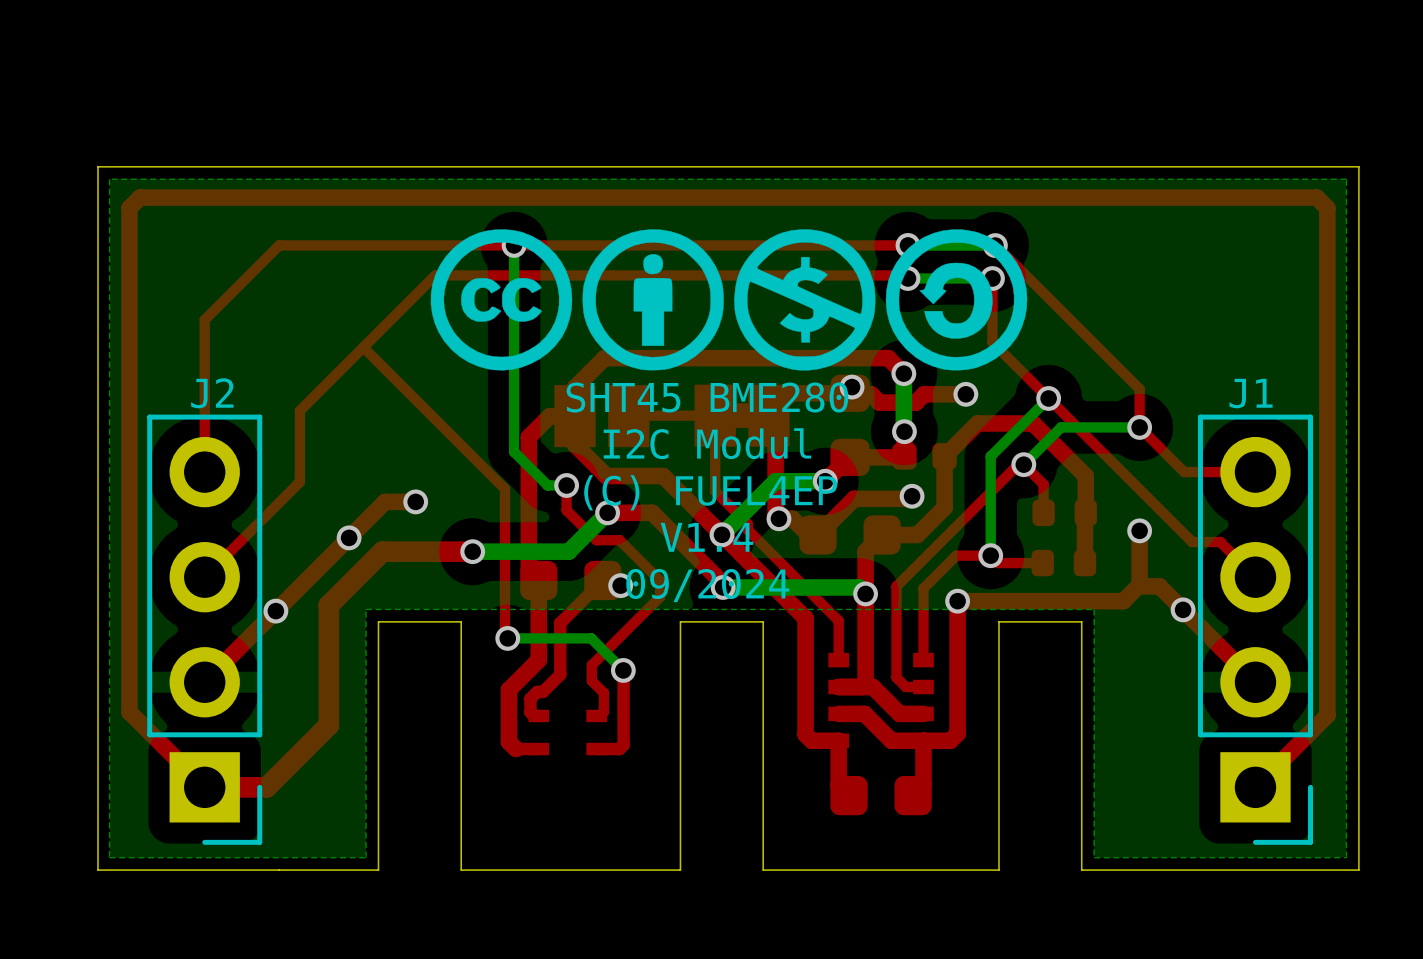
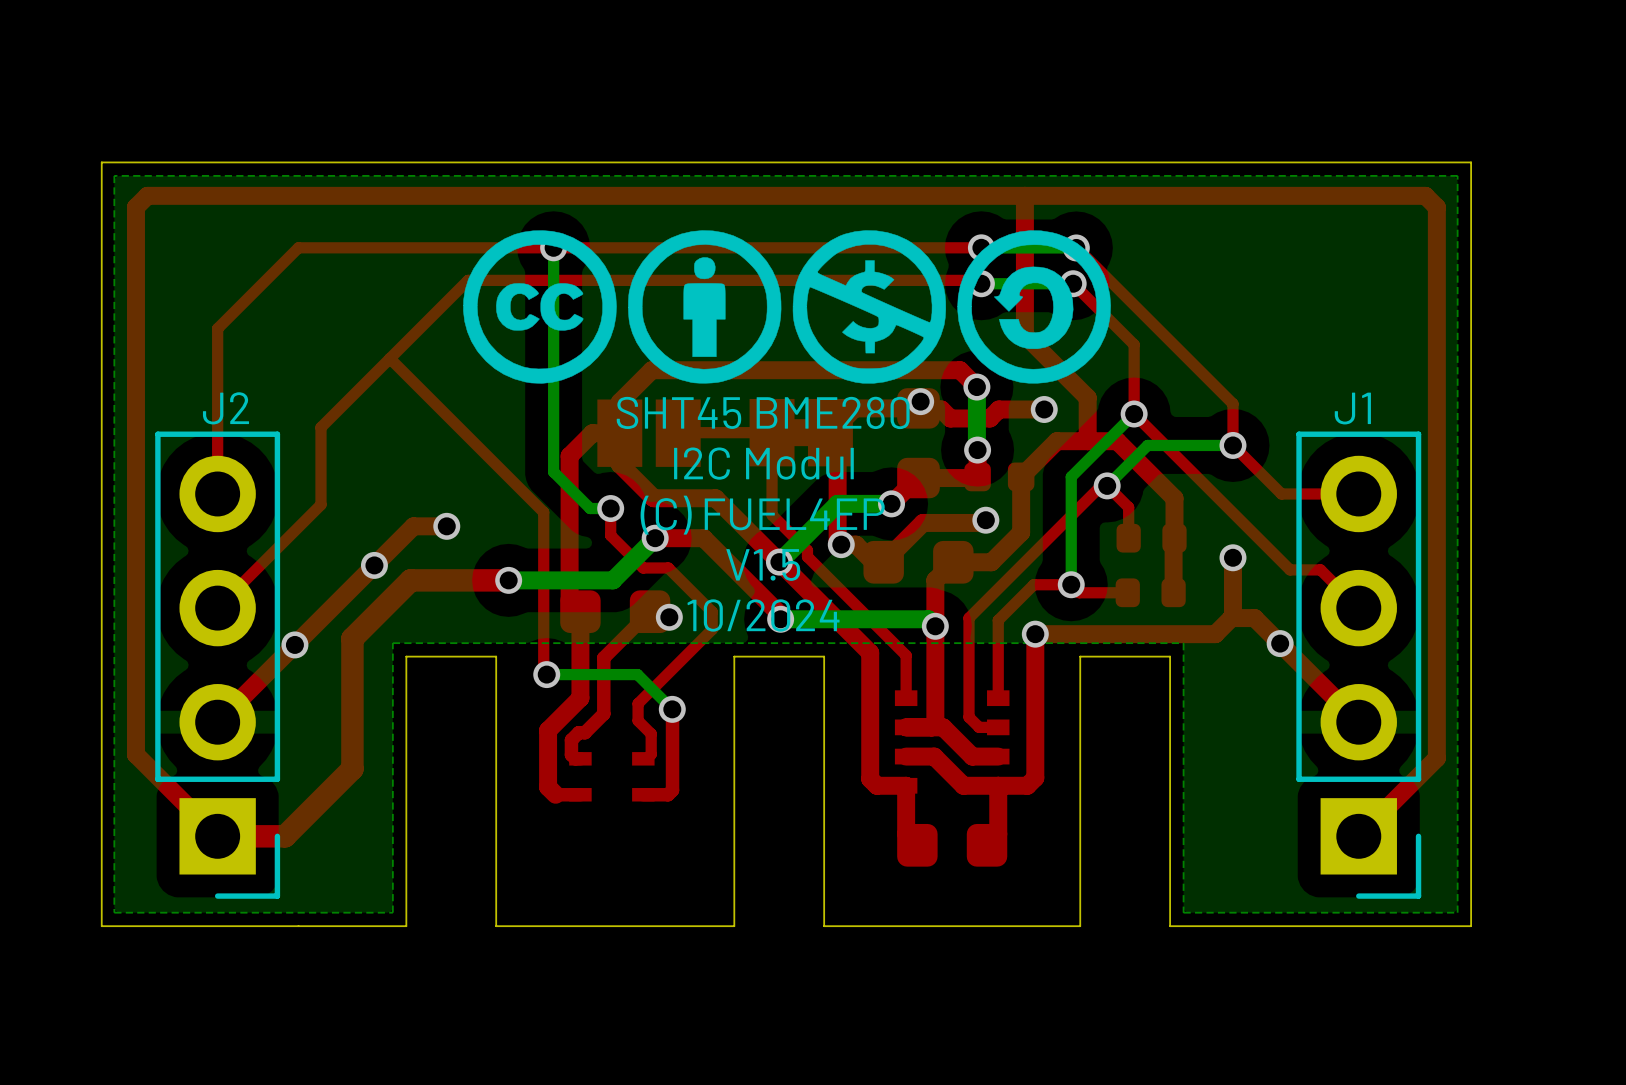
top track: none -> (1024, 195) (1024, 335) (1087, 397) (1087, 441)
top track: (992, 278) (992, 342) (1048, 398) -> (1073, 283) (1134, 344) (1134, 414)
text: V1.4 (707, 537) -> V1.5 (763, 564)
text: 09/2024 (707, 585) -> 10/2024 (763, 615)

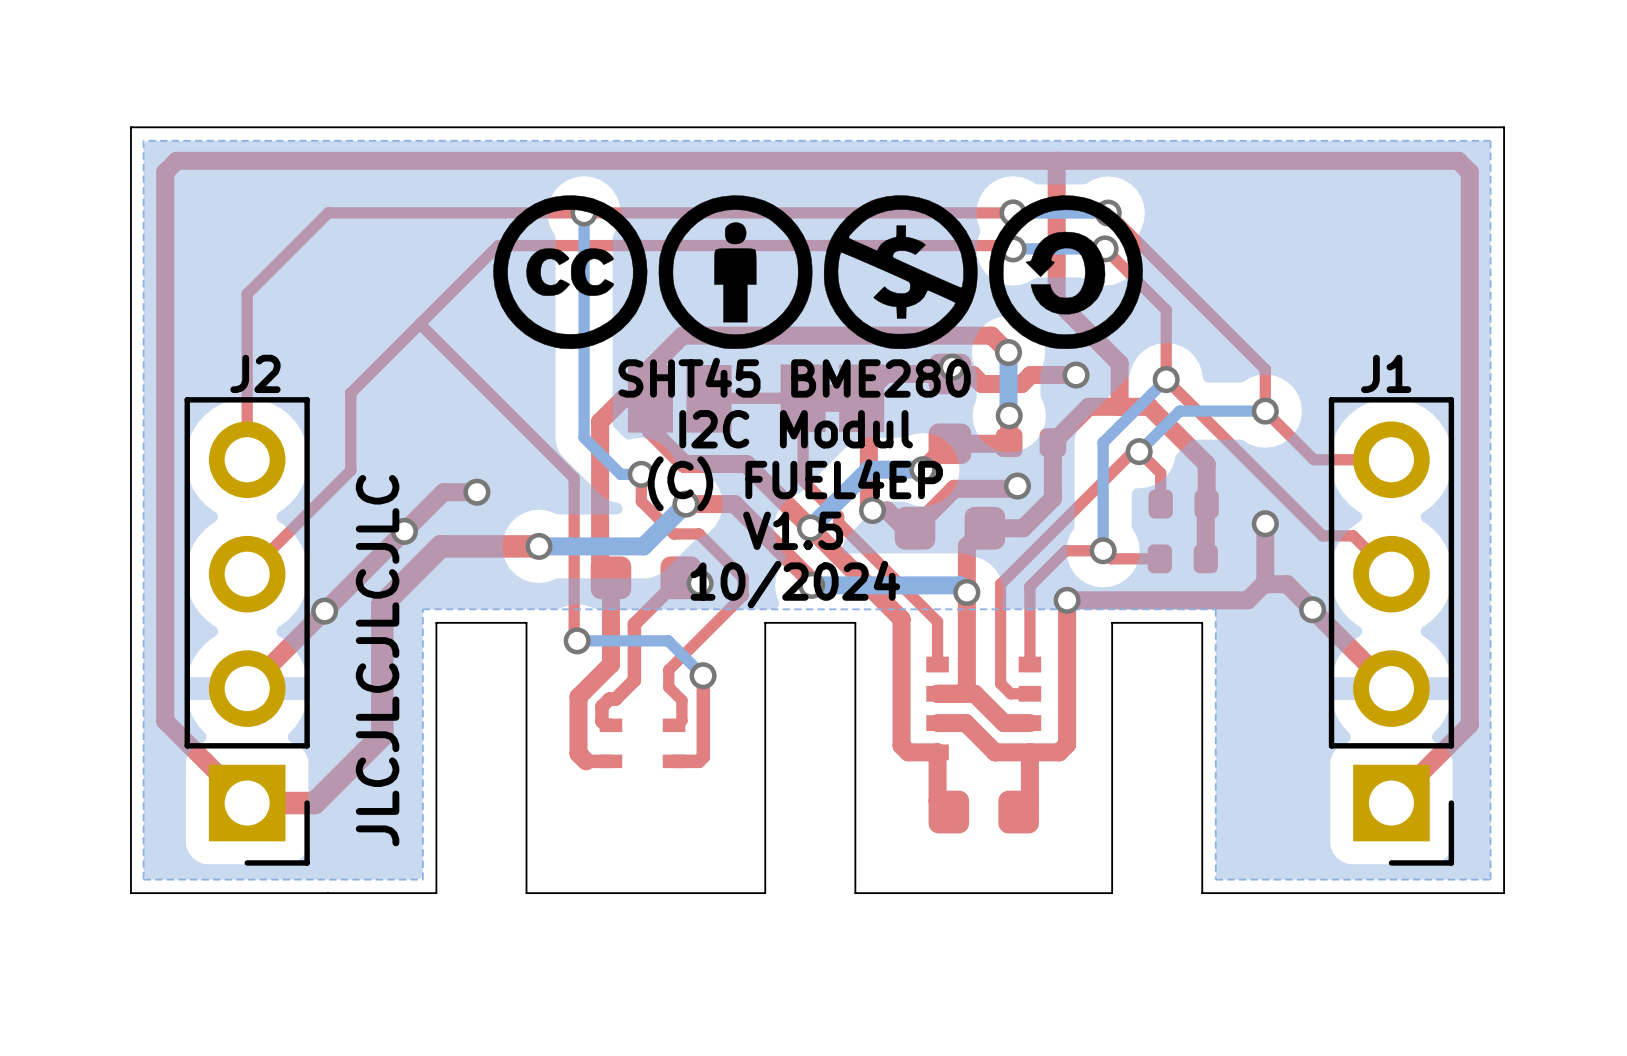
text: none -> JLCJLCJLCJLC (377, 660)

